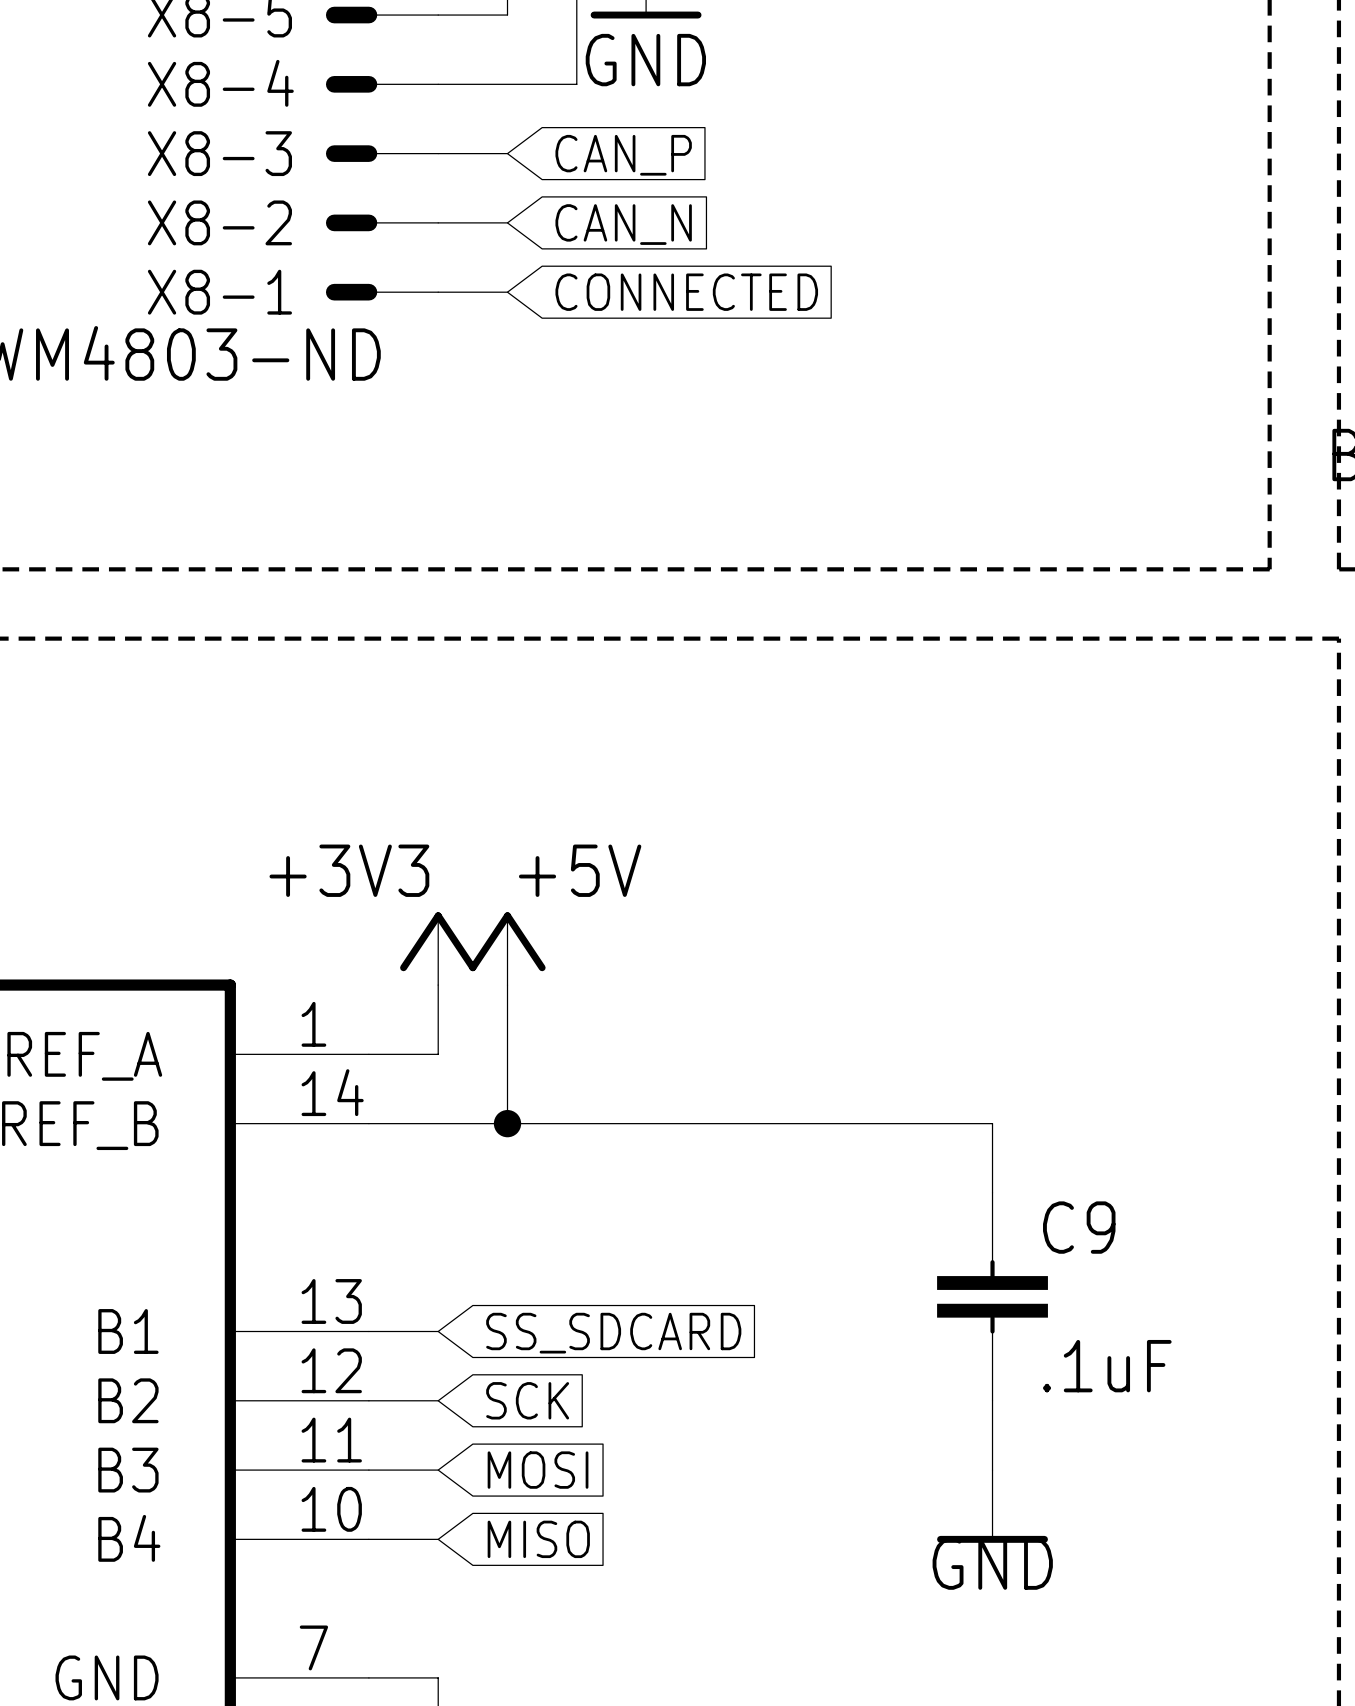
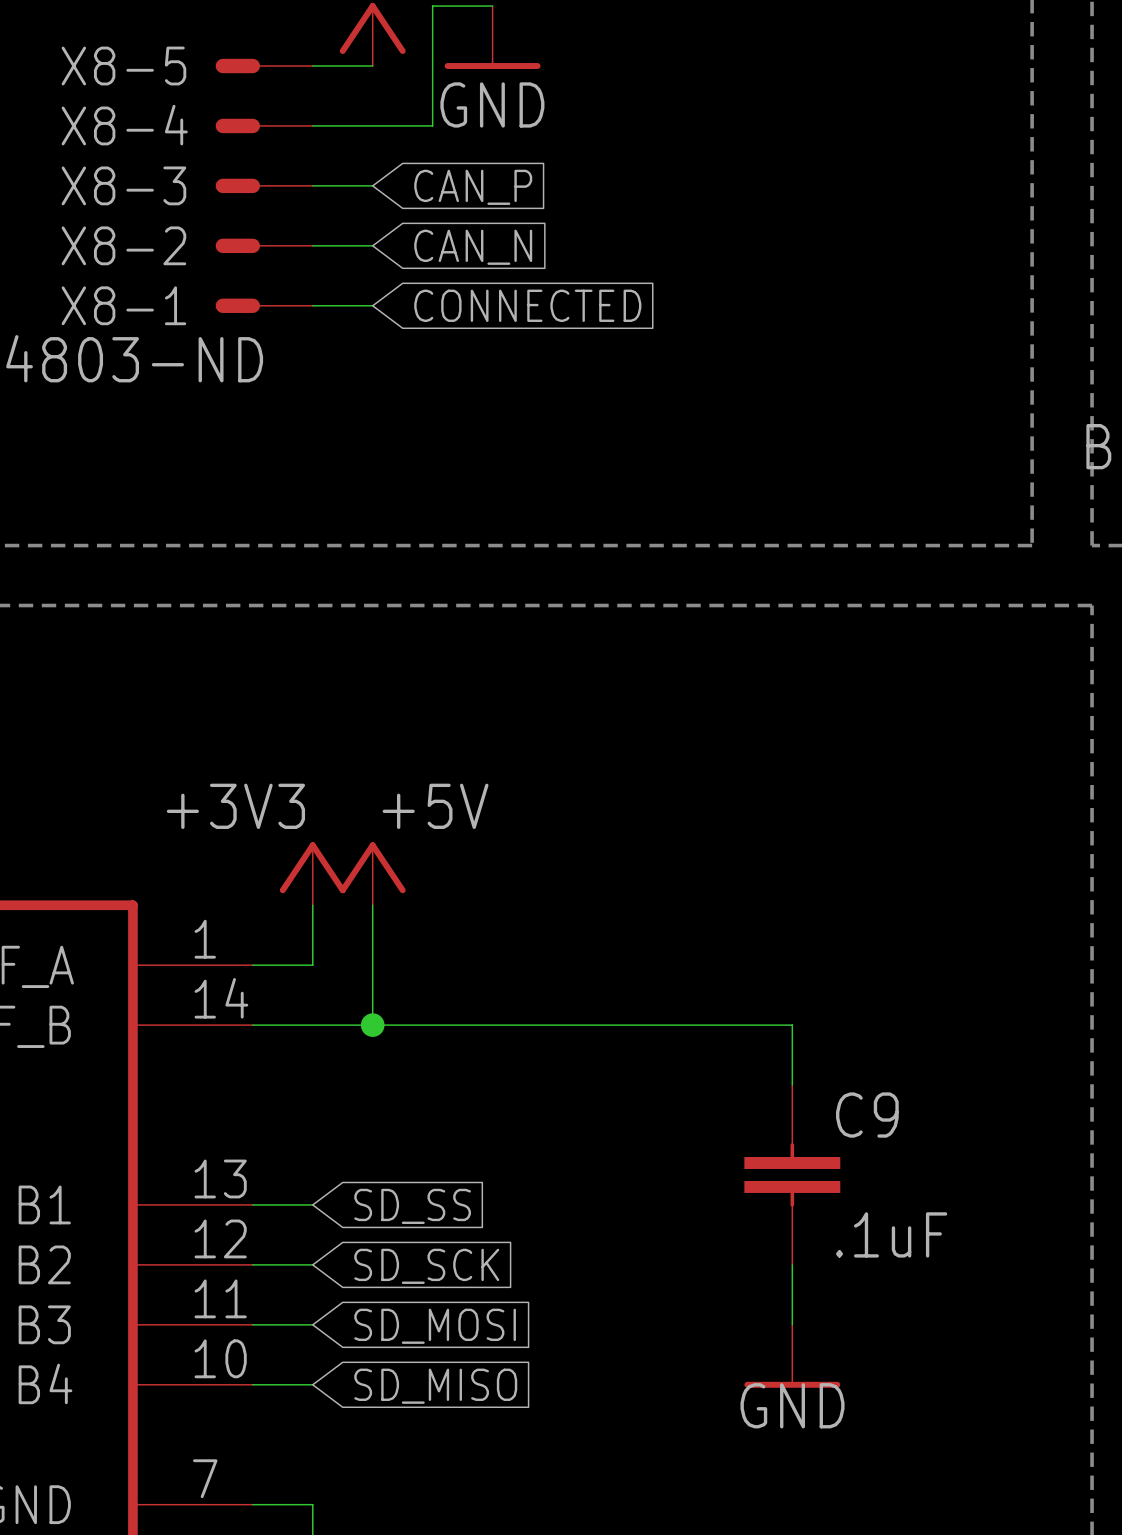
global label: SS_SDCARD (613, 1333) -> SD_SS (412, 1206)
global label: SCK (527, 1400) -> SD_SCK (426, 1266)
global label: MOSI (538, 1470) -> SD_MOSI (435, 1326)
global label: MISO (538, 1539) -> SD_MISO (435, 1386)

